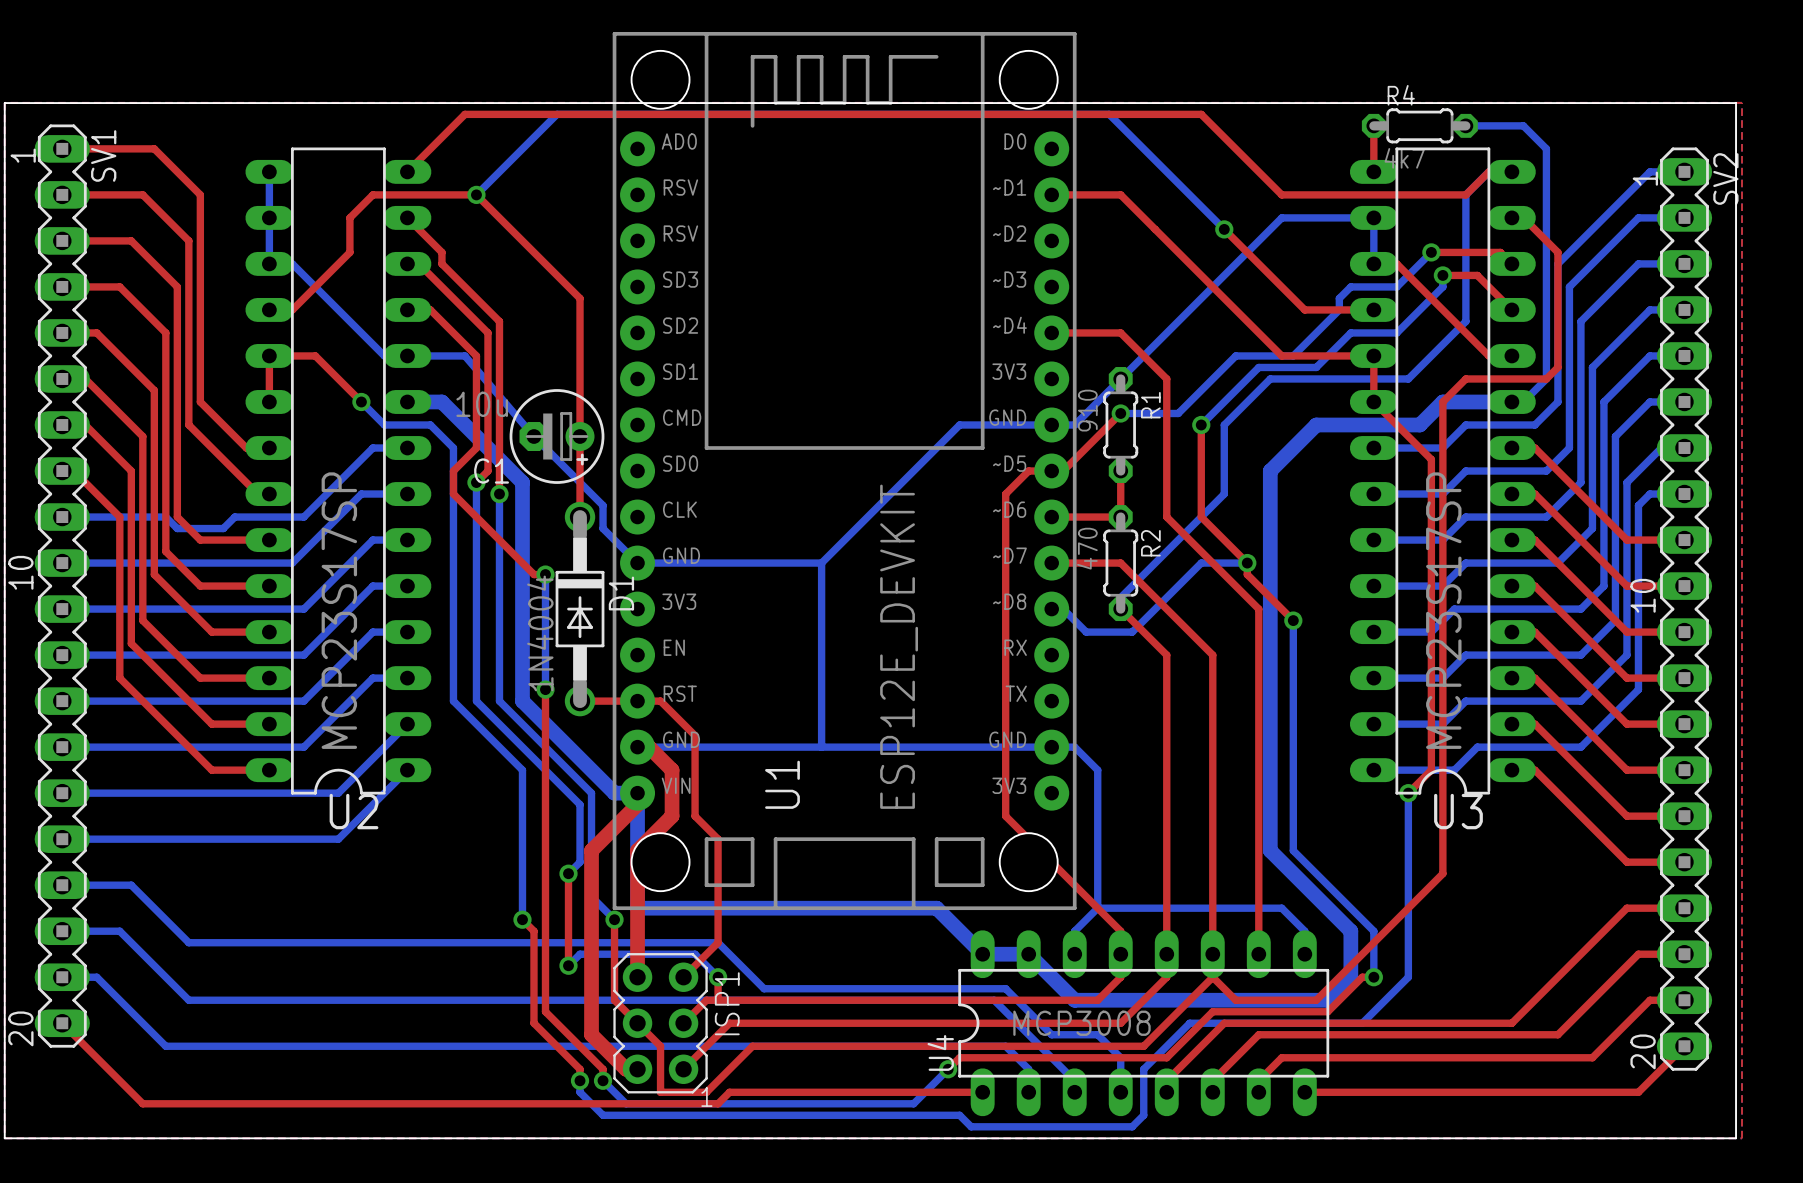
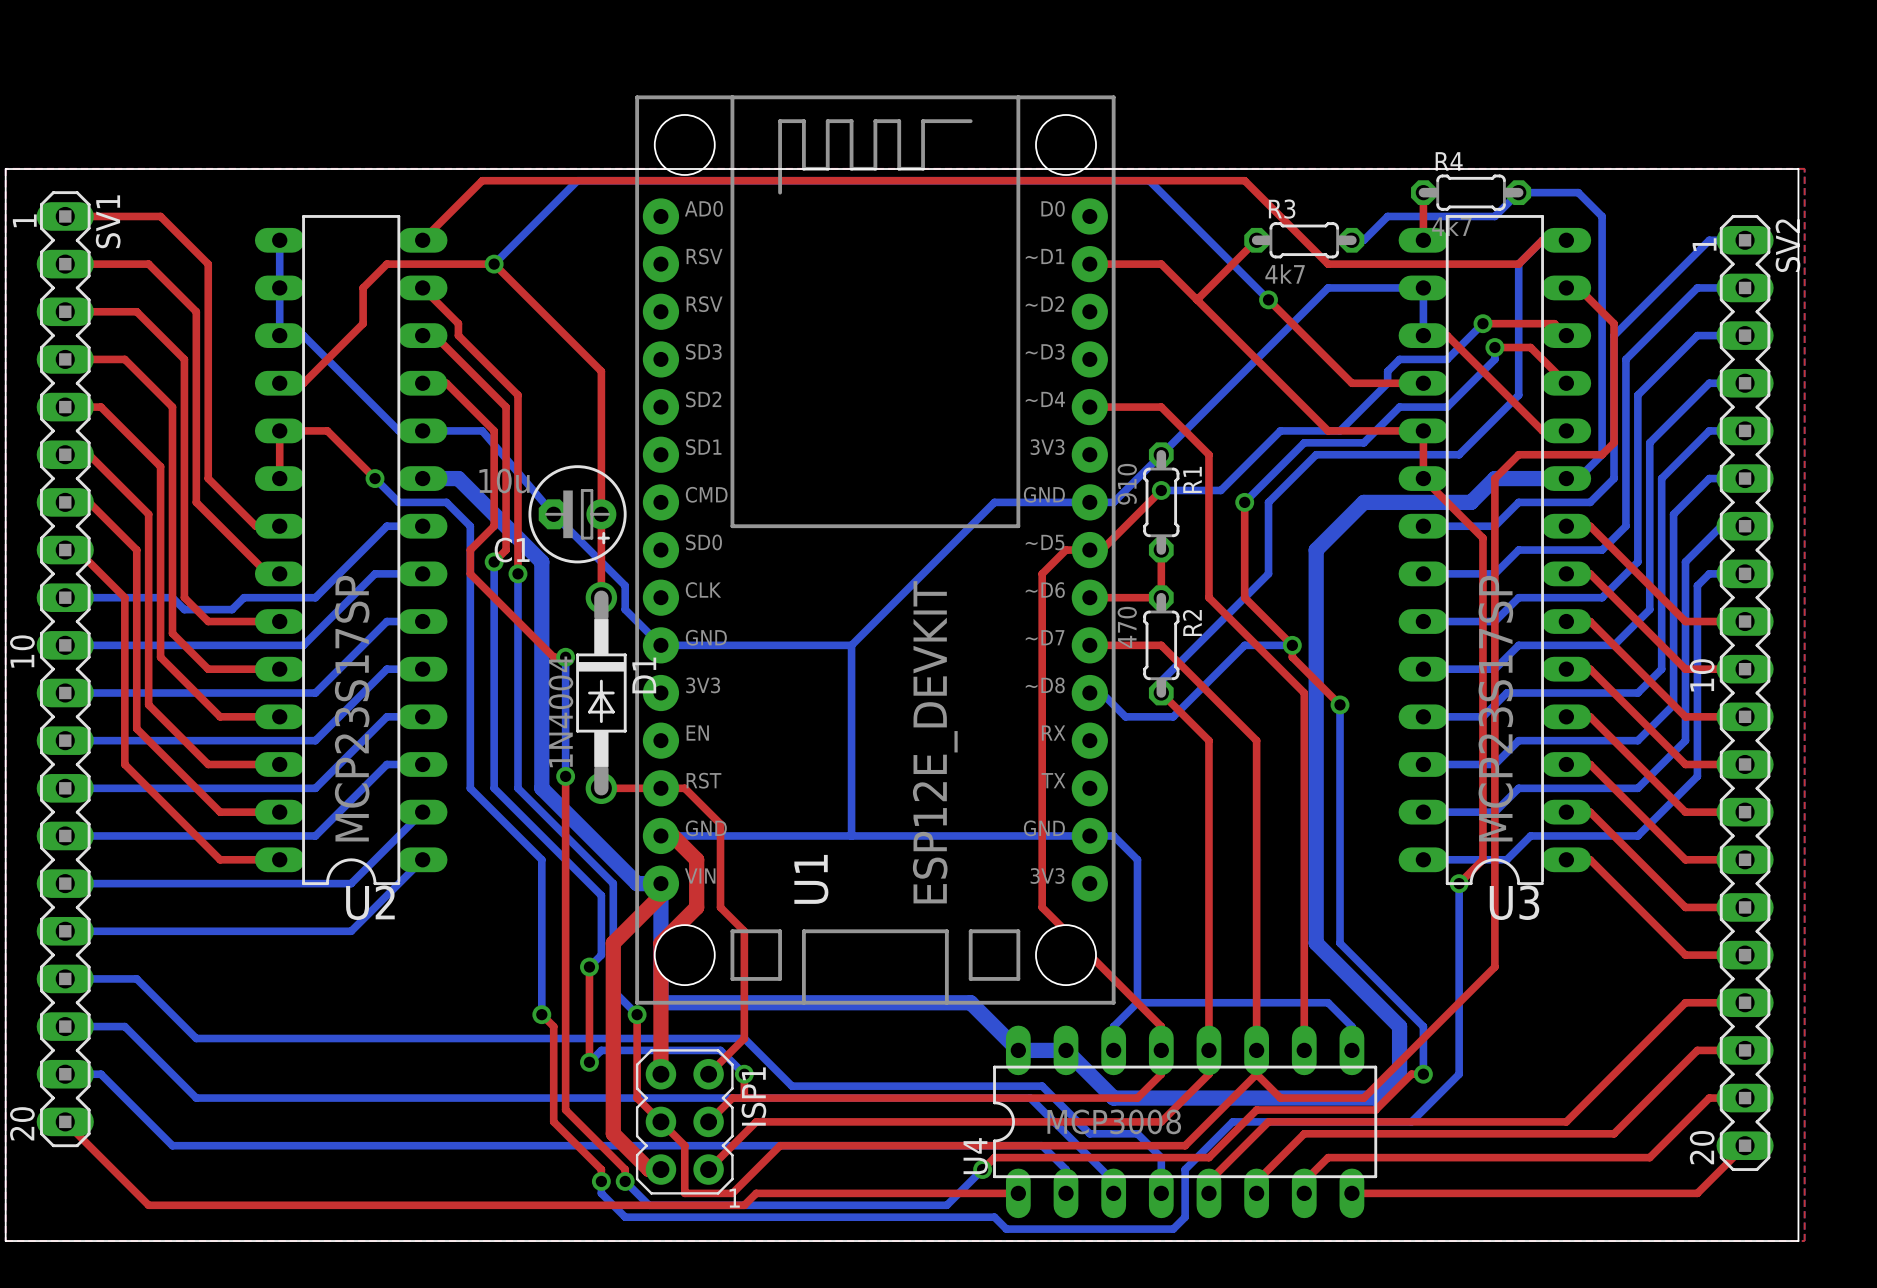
bottom track: none -> (1518, 192) (1494, 216) (1387, 216) (1363, 240) (1351, 240)
top track: none -> (1256, 240) (1197, 299)
R3: none -> 4k7 (1304, 240)

